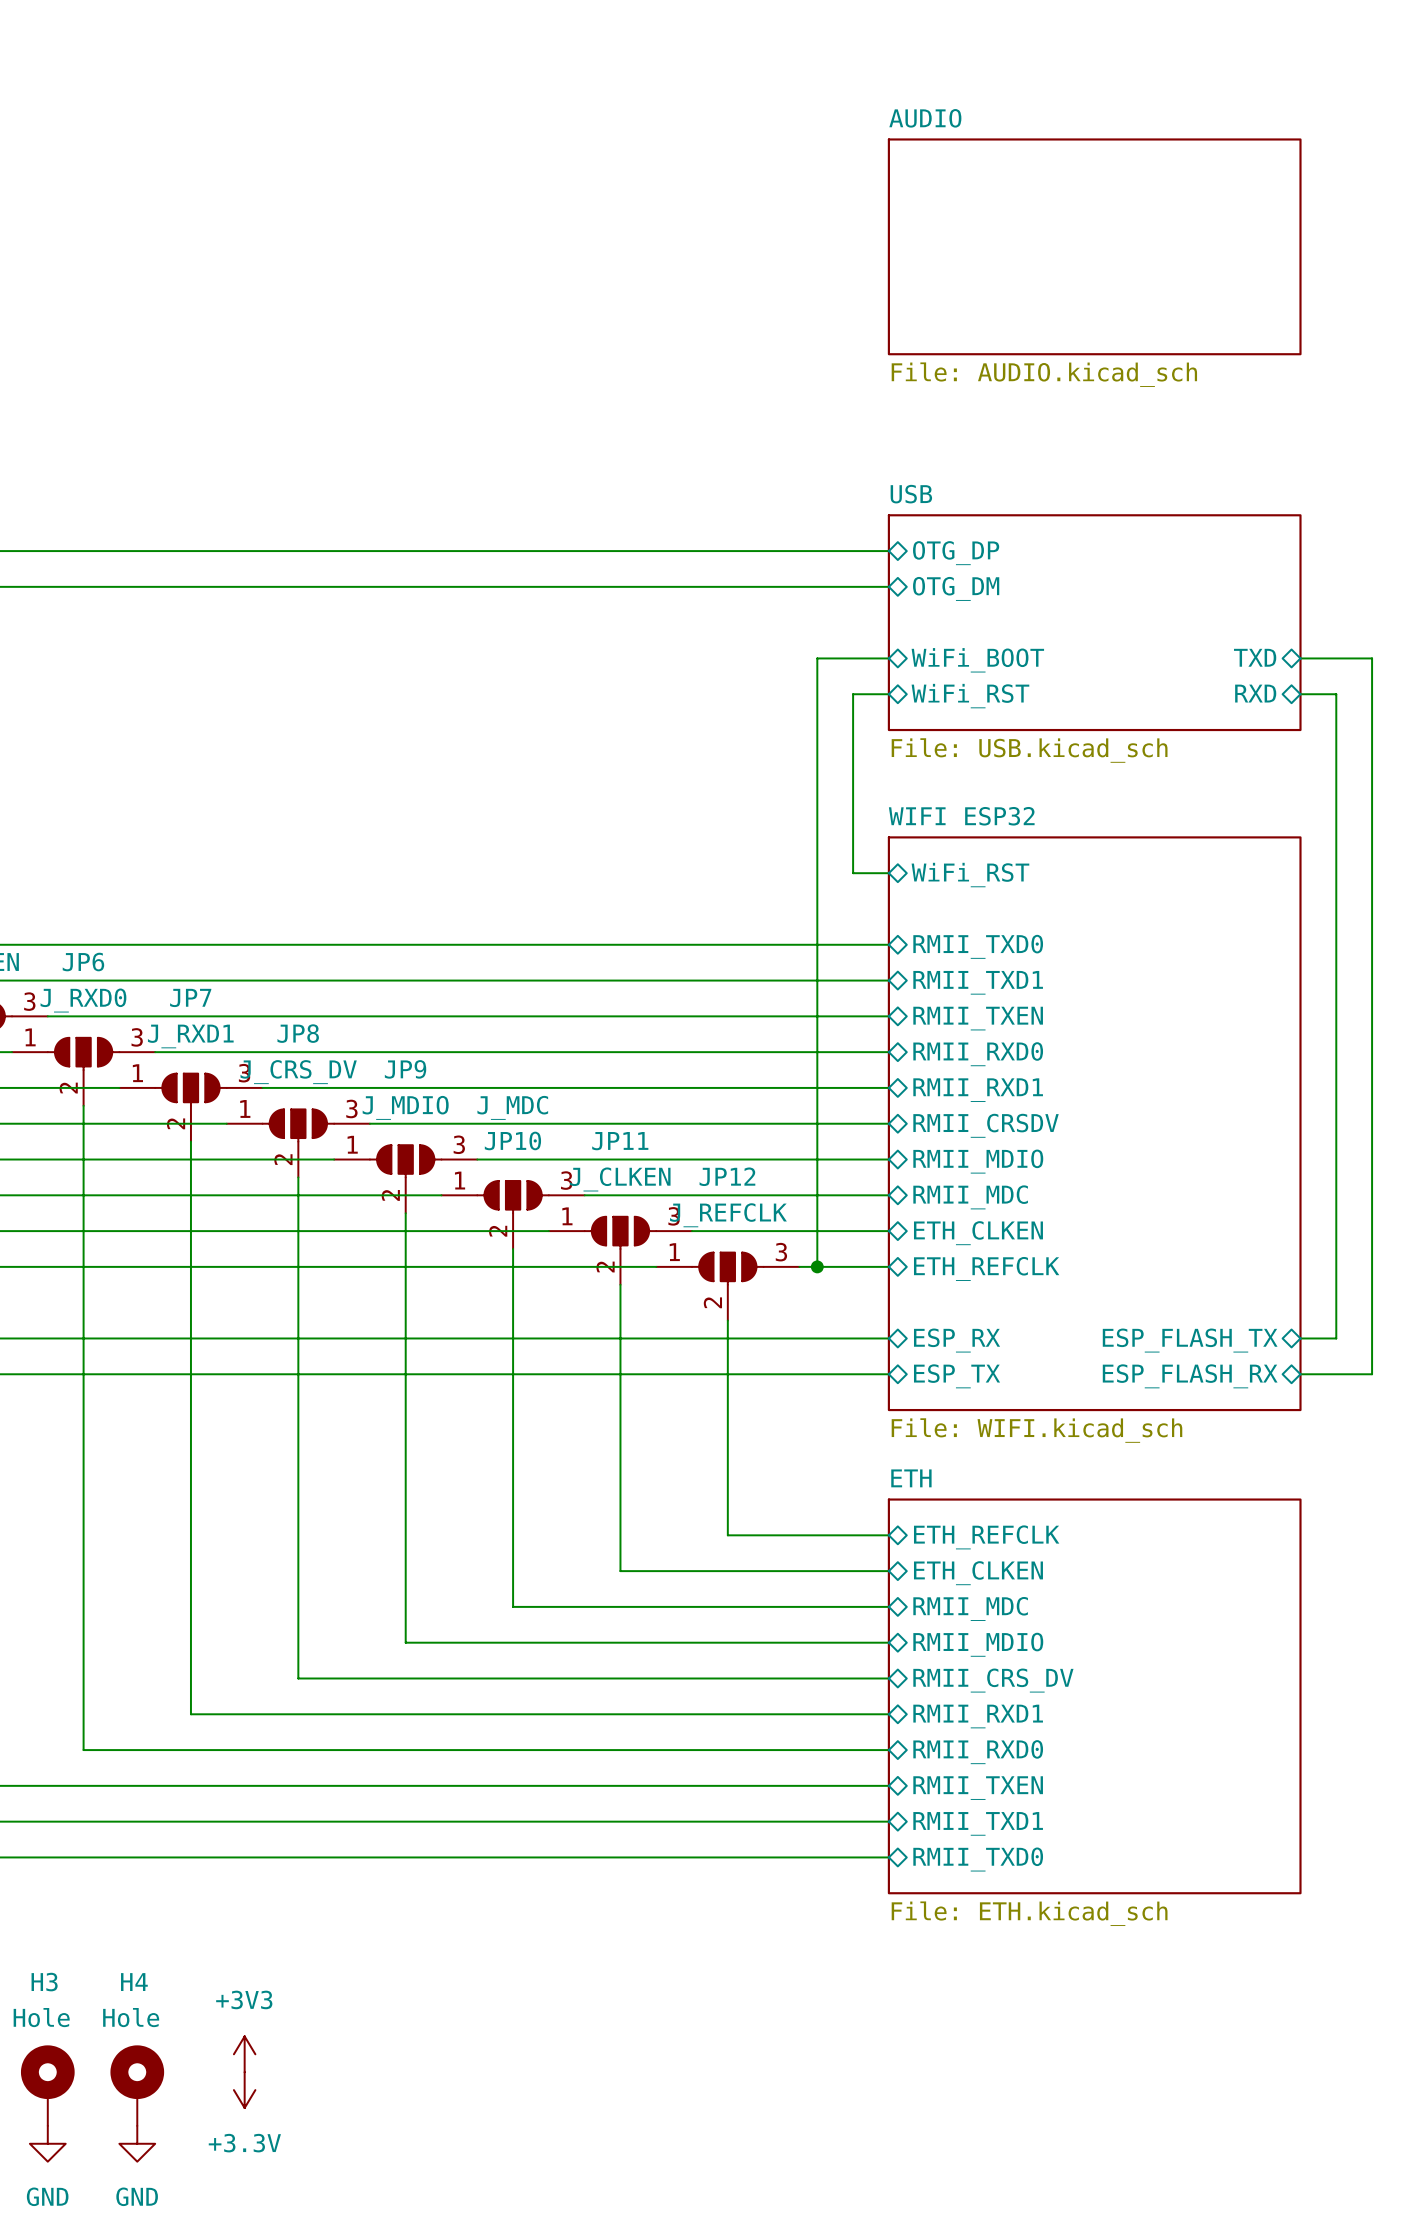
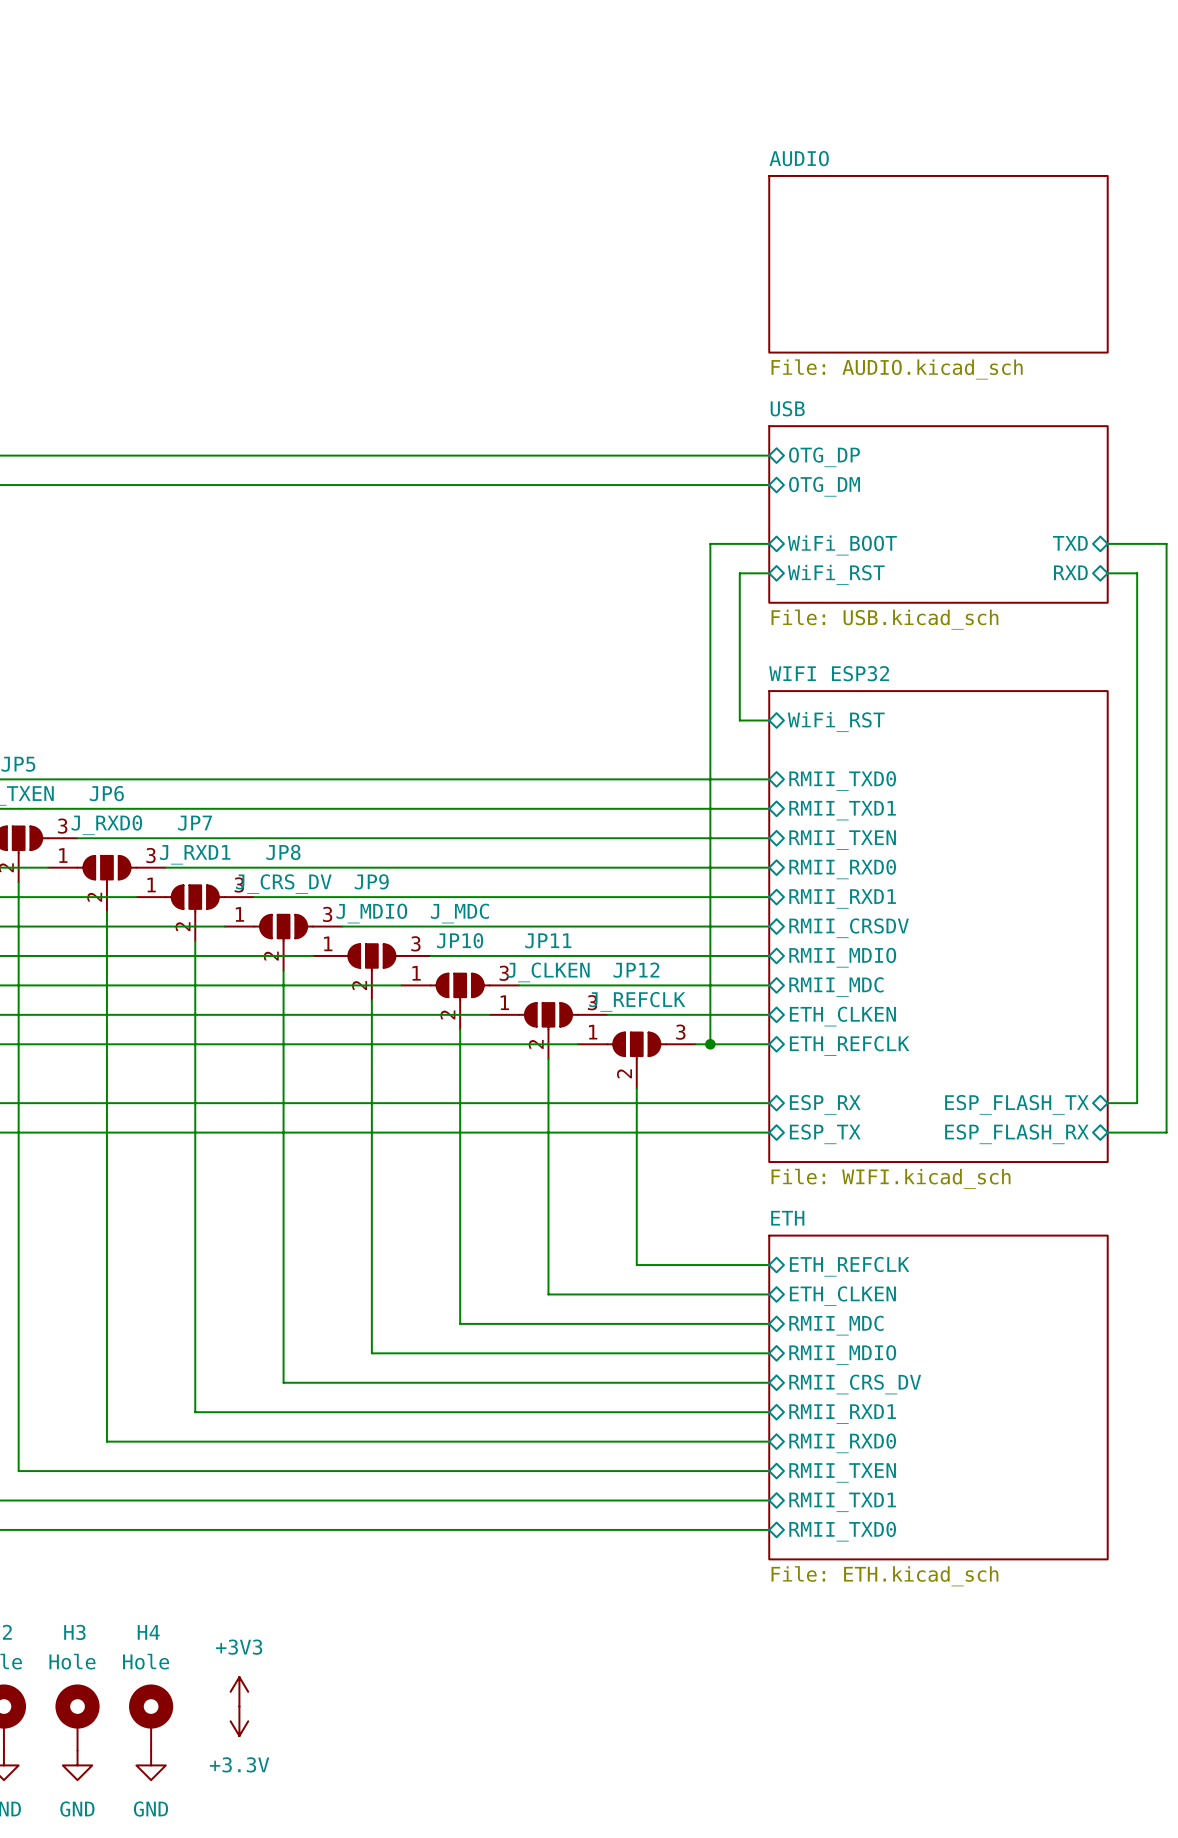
sheet AUDIO position: (1094, 246) -> (938, 264)

